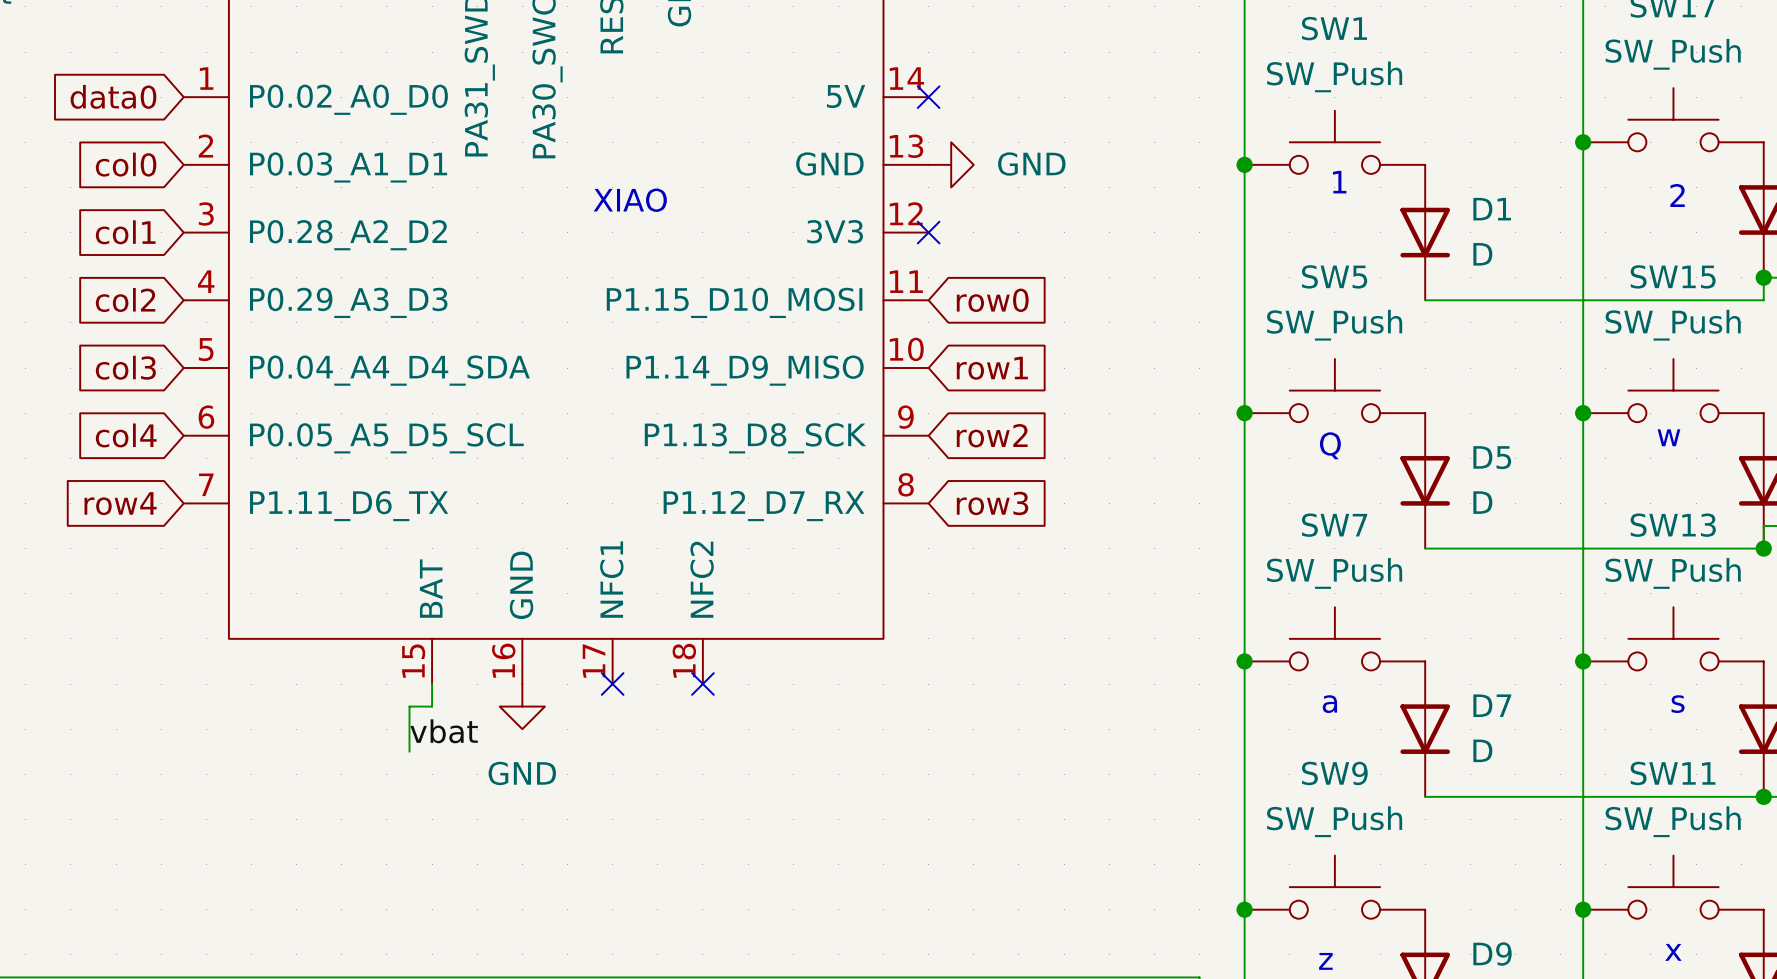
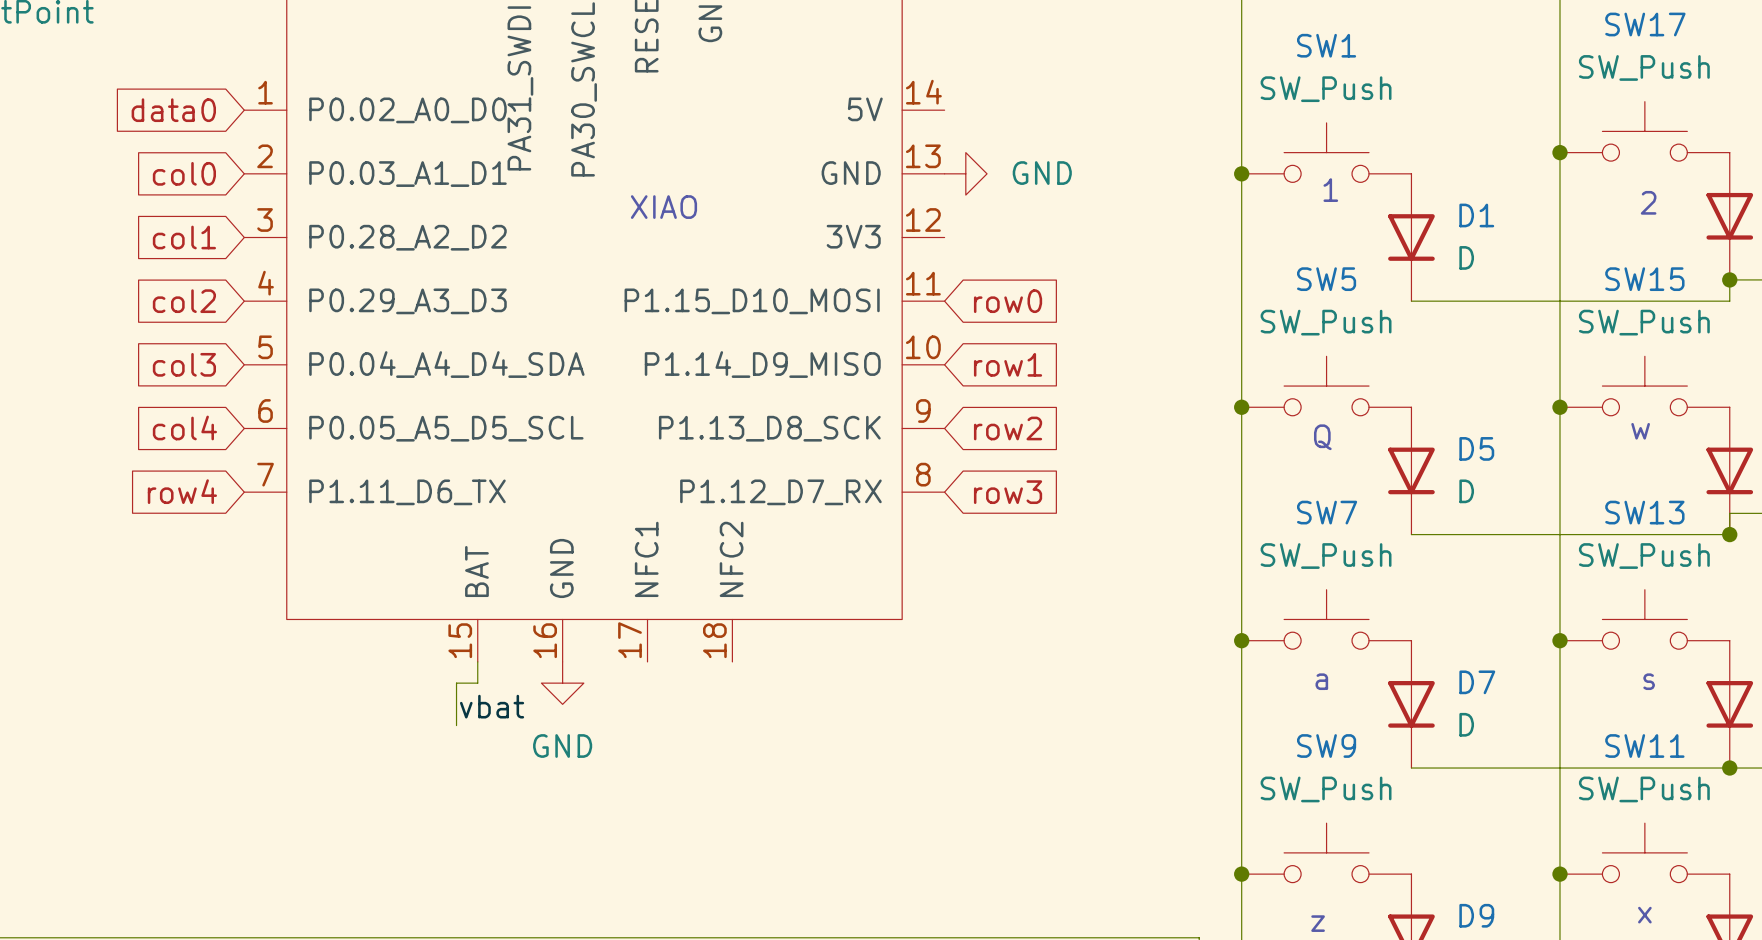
no-connect mark: (928, 97) -> none
no-connect mark: (928, 232) -> none
no-connect mark: (612, 684) -> none
no-connect mark: (702, 684) -> none

